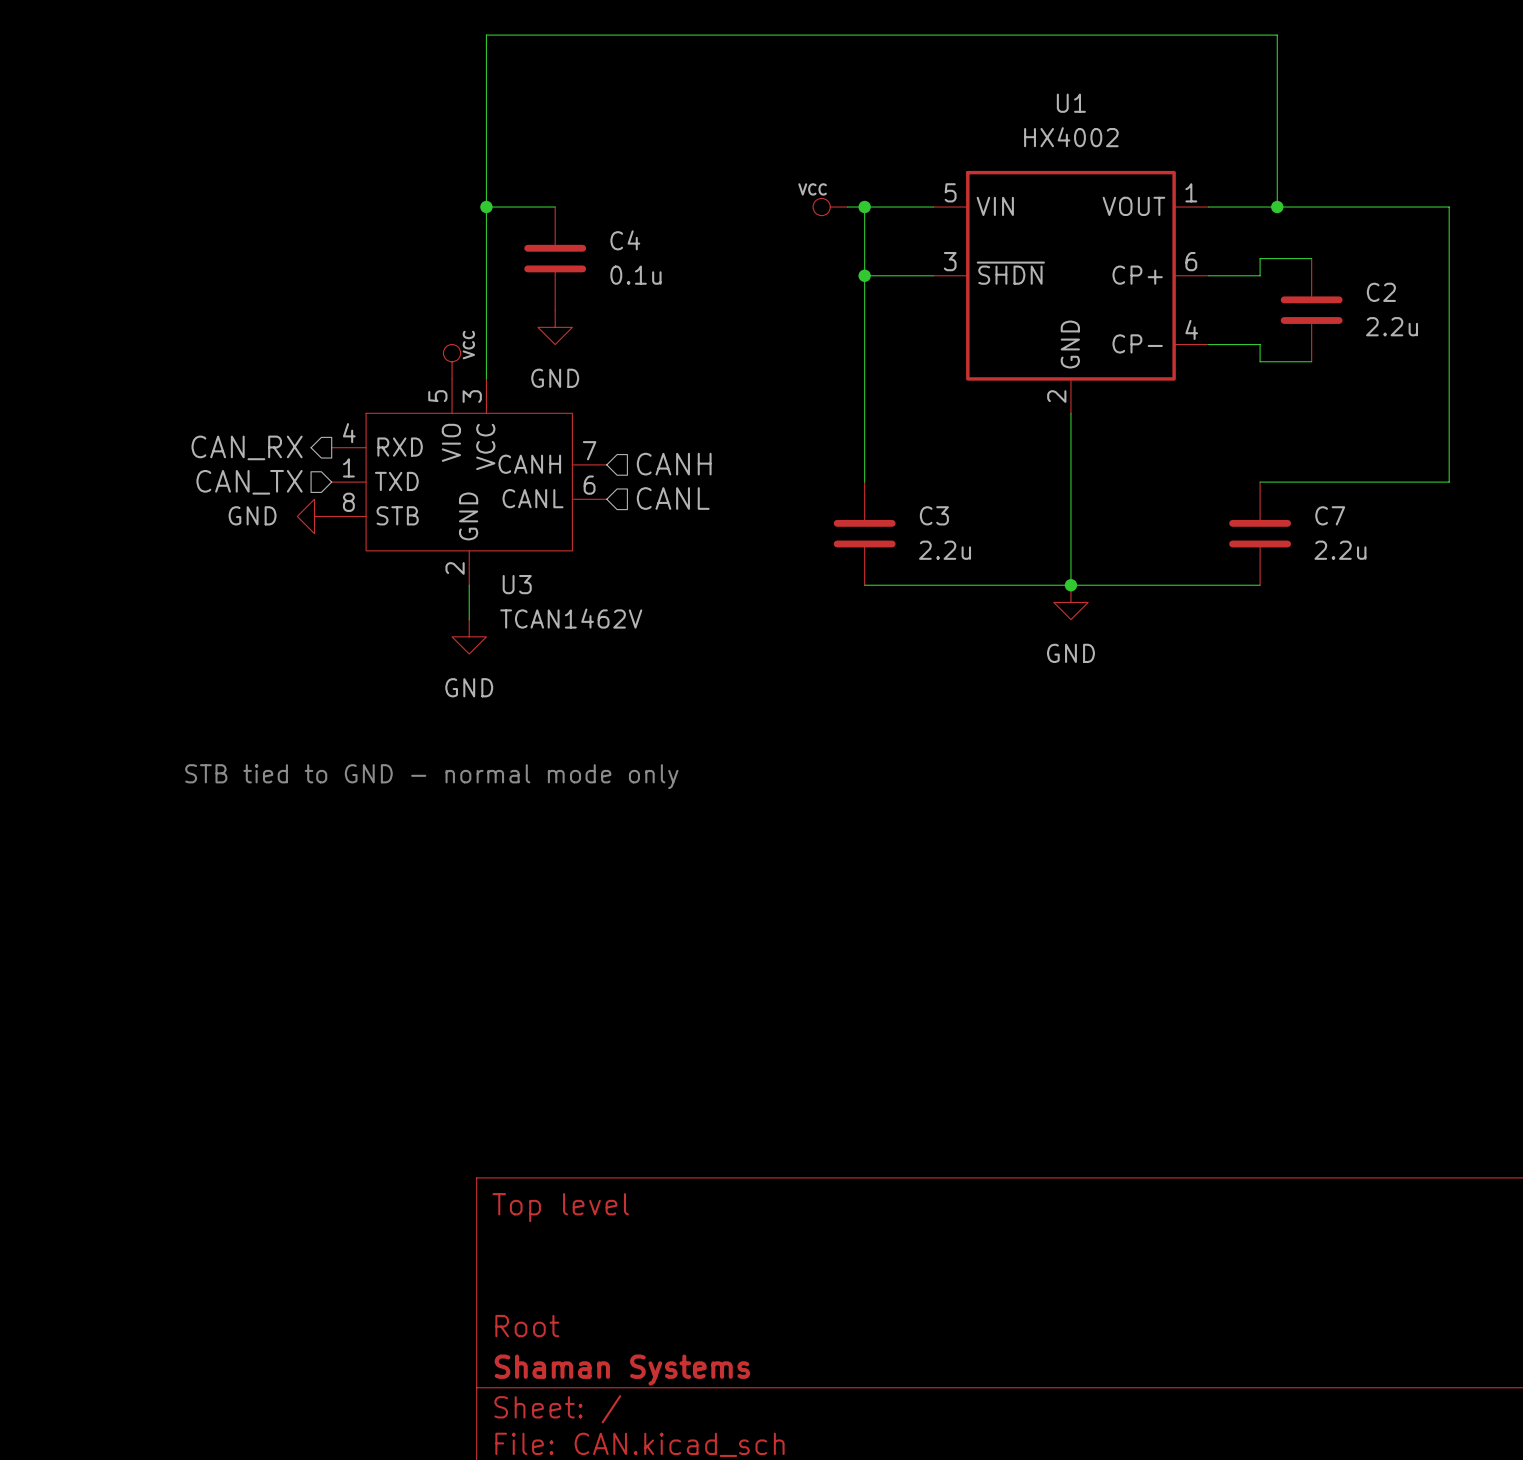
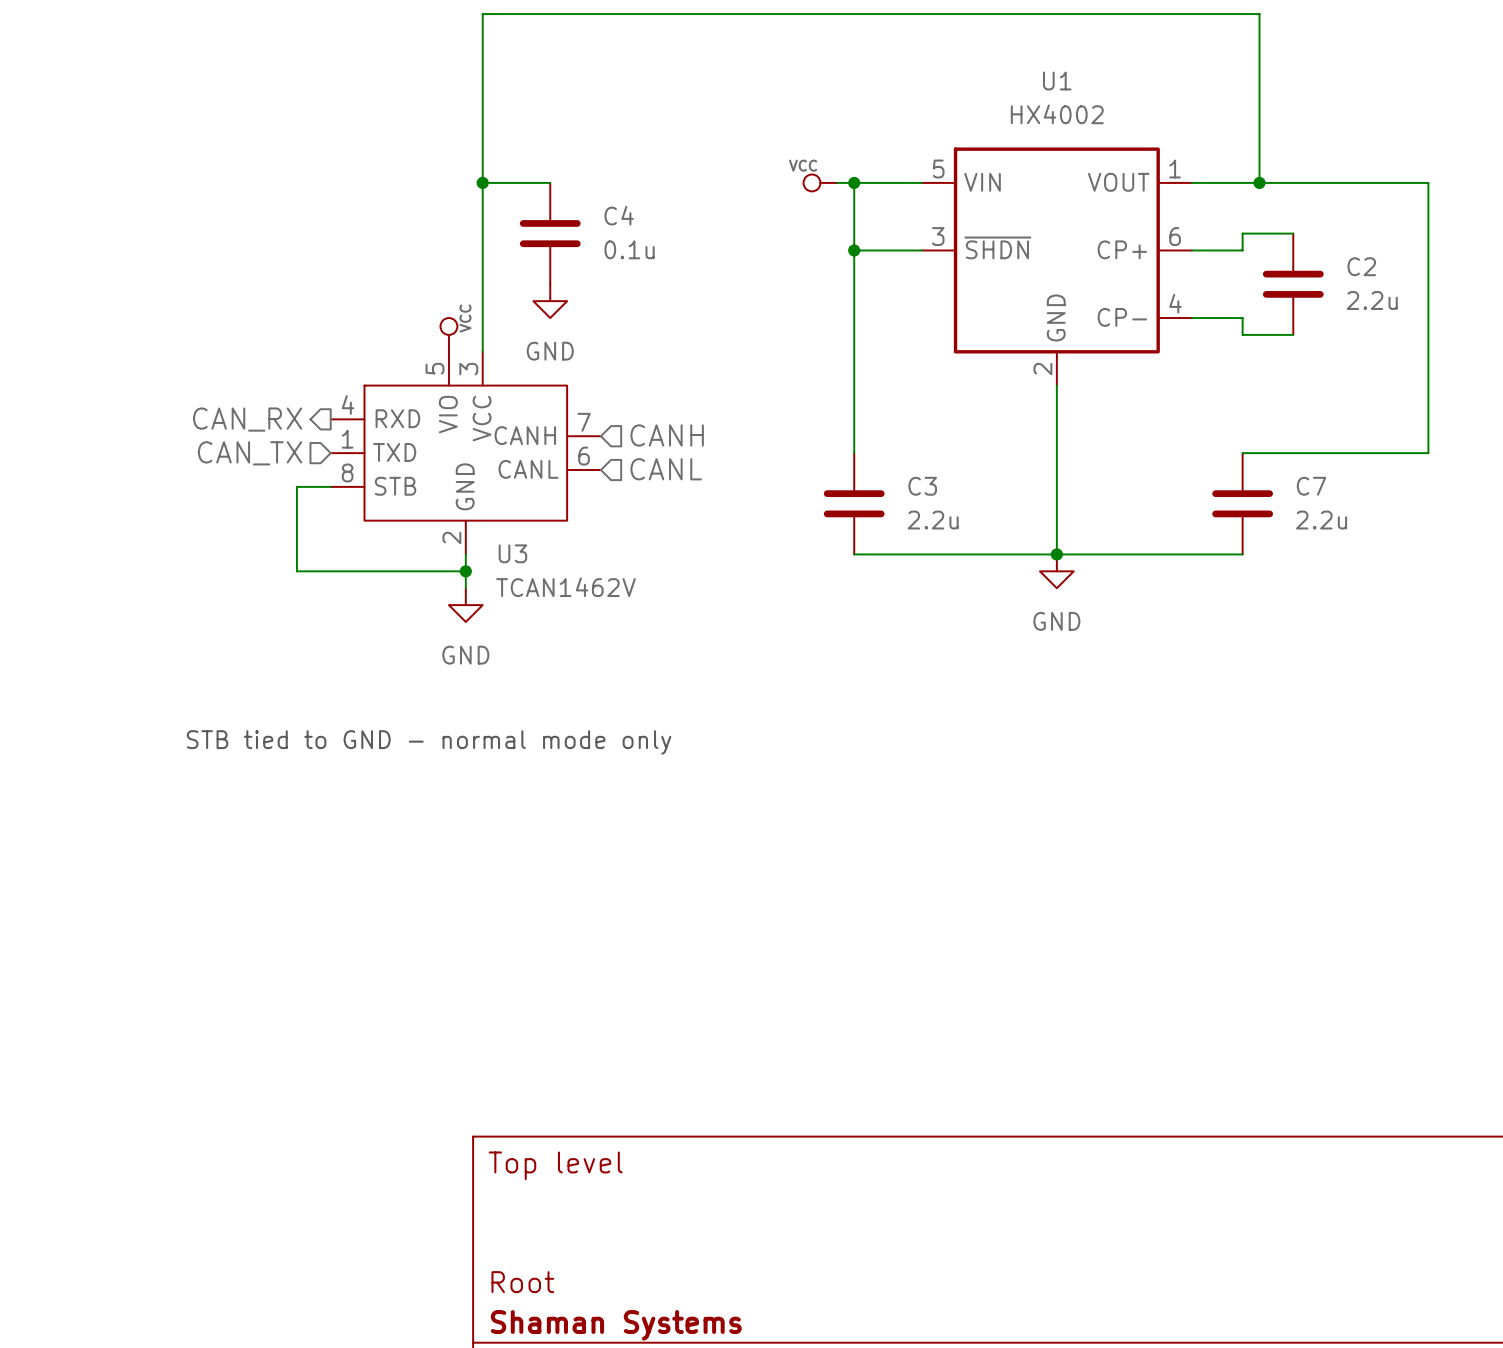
power symbol: GND (314, 516) -> none
wire: none -> (330, 486) (296, 486) (296, 571) (465, 571)
junction: none -> (465, 571)

